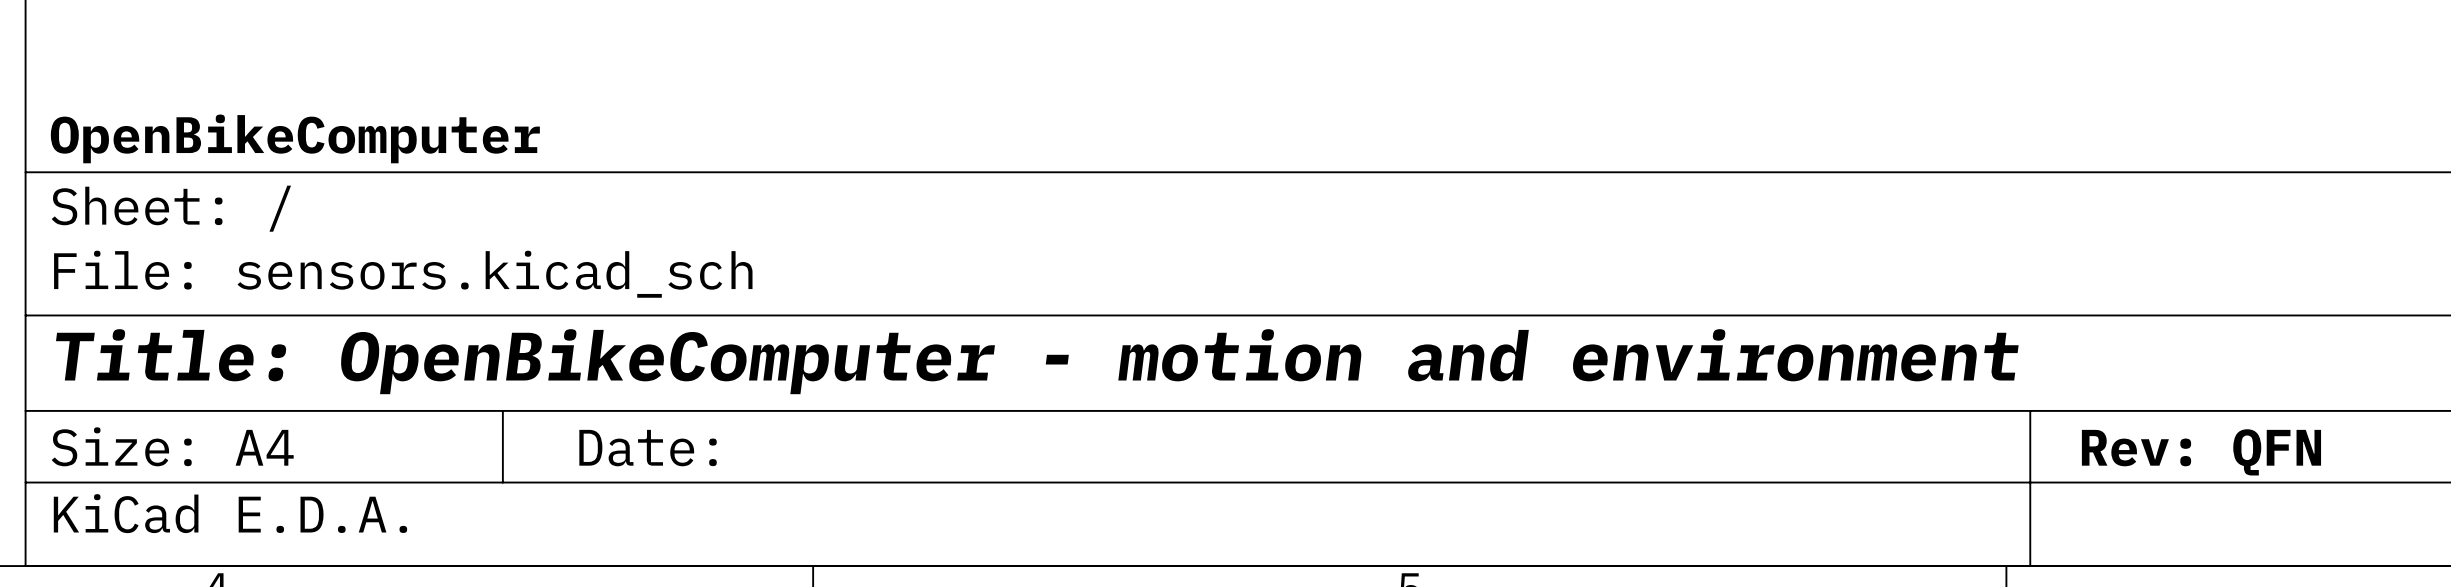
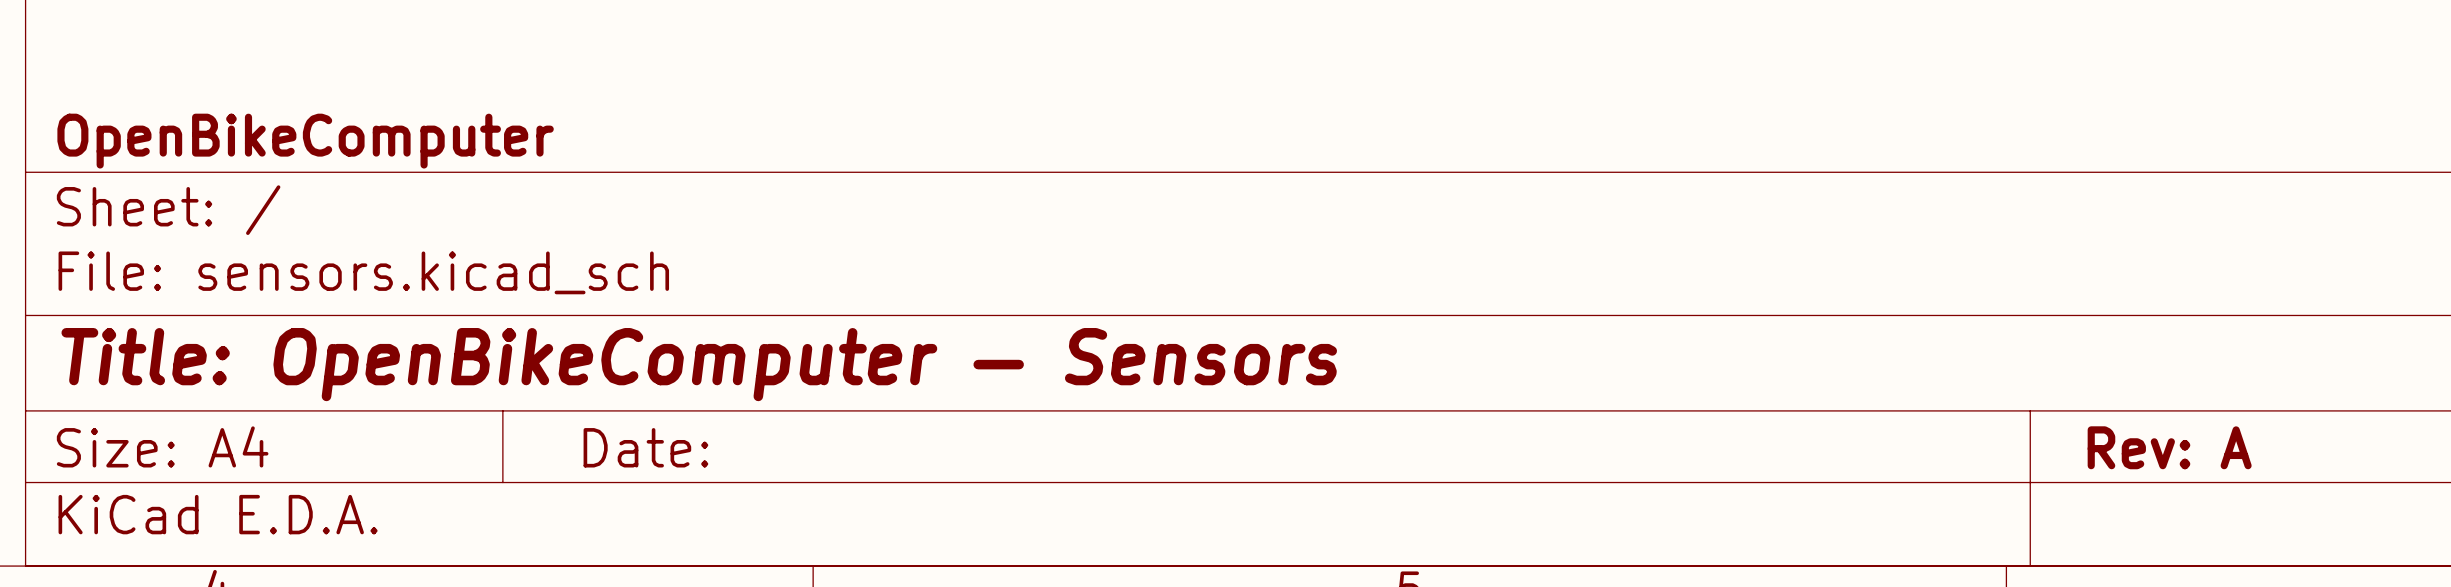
title block: Title: OpenBikeComputer - motion and environment (1037, 361) -> Title: OpenBikeComputer — Sensors (699, 364)
title block: Rev: QFN (2201, 452) -> Rev: A (2169, 447)

